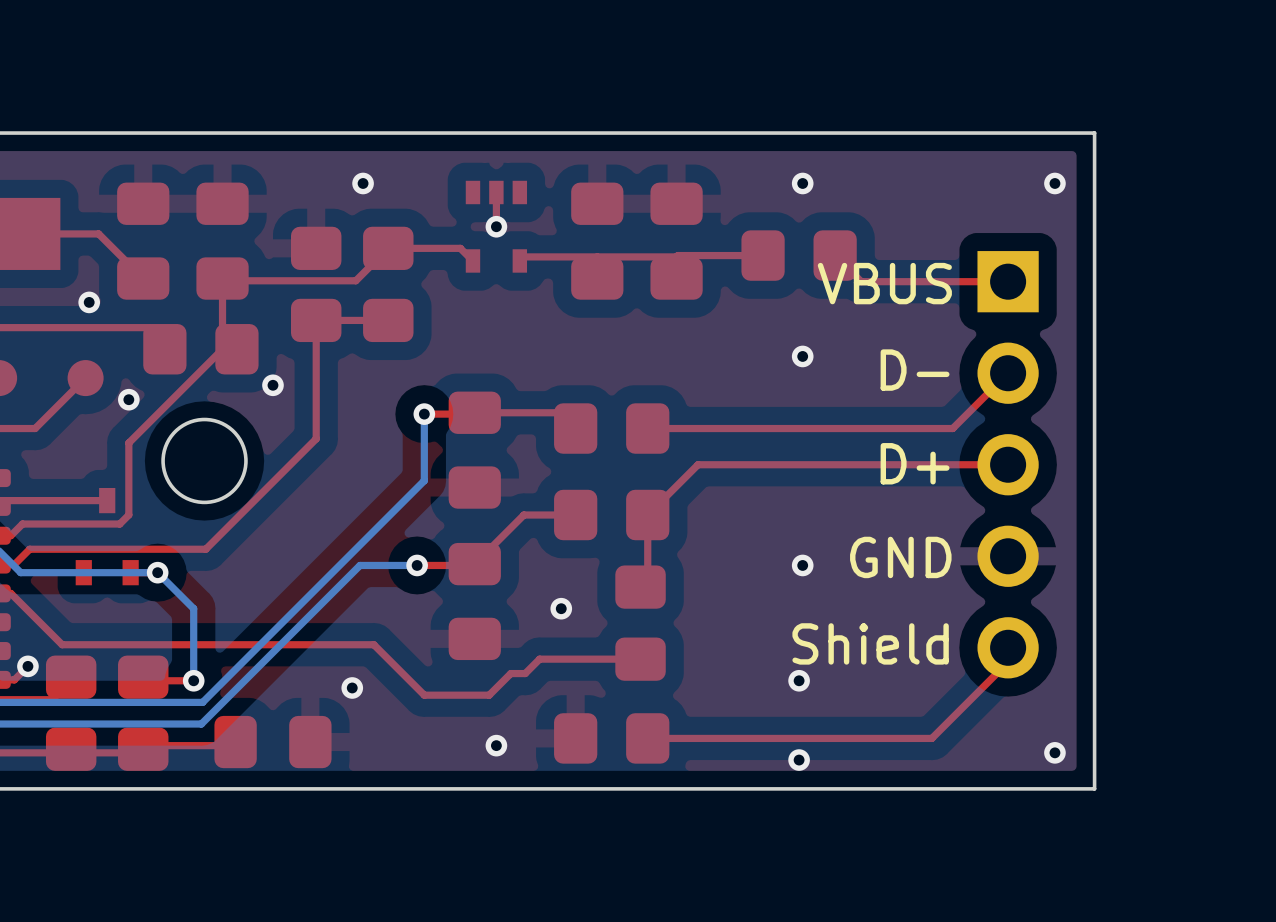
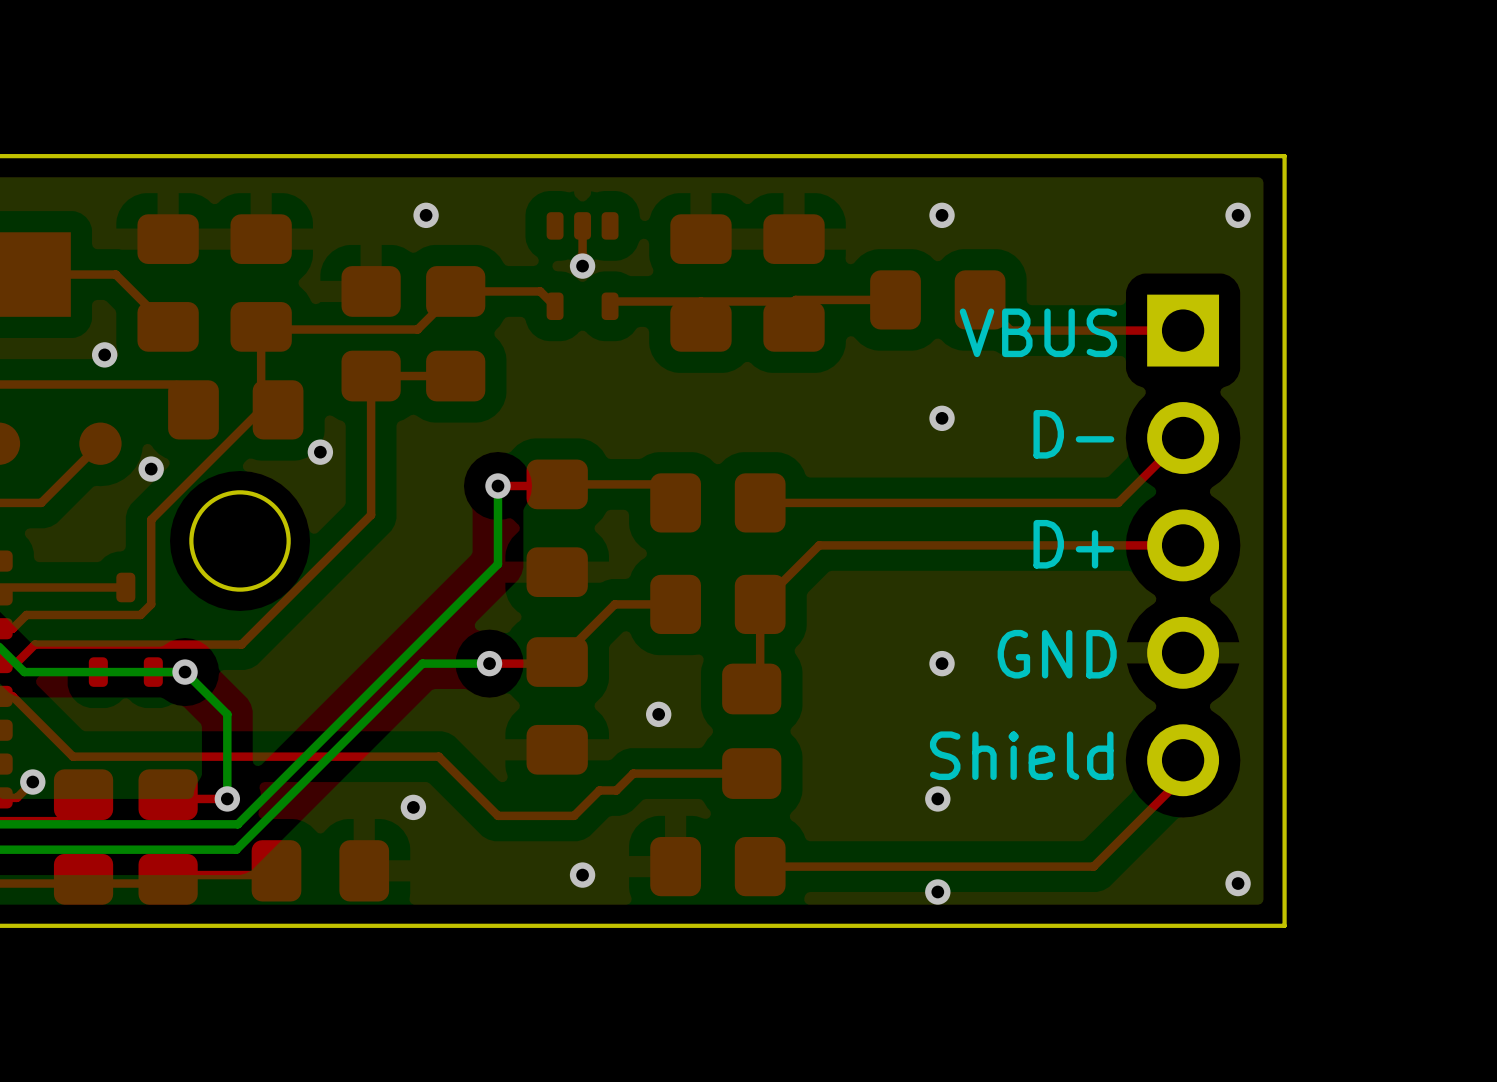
part footprint: [465, 180, 528, 273] -> [546, 212, 619, 321]
part footprint: [75, 487, 139, 586] -> [88, 572, 163, 687]

